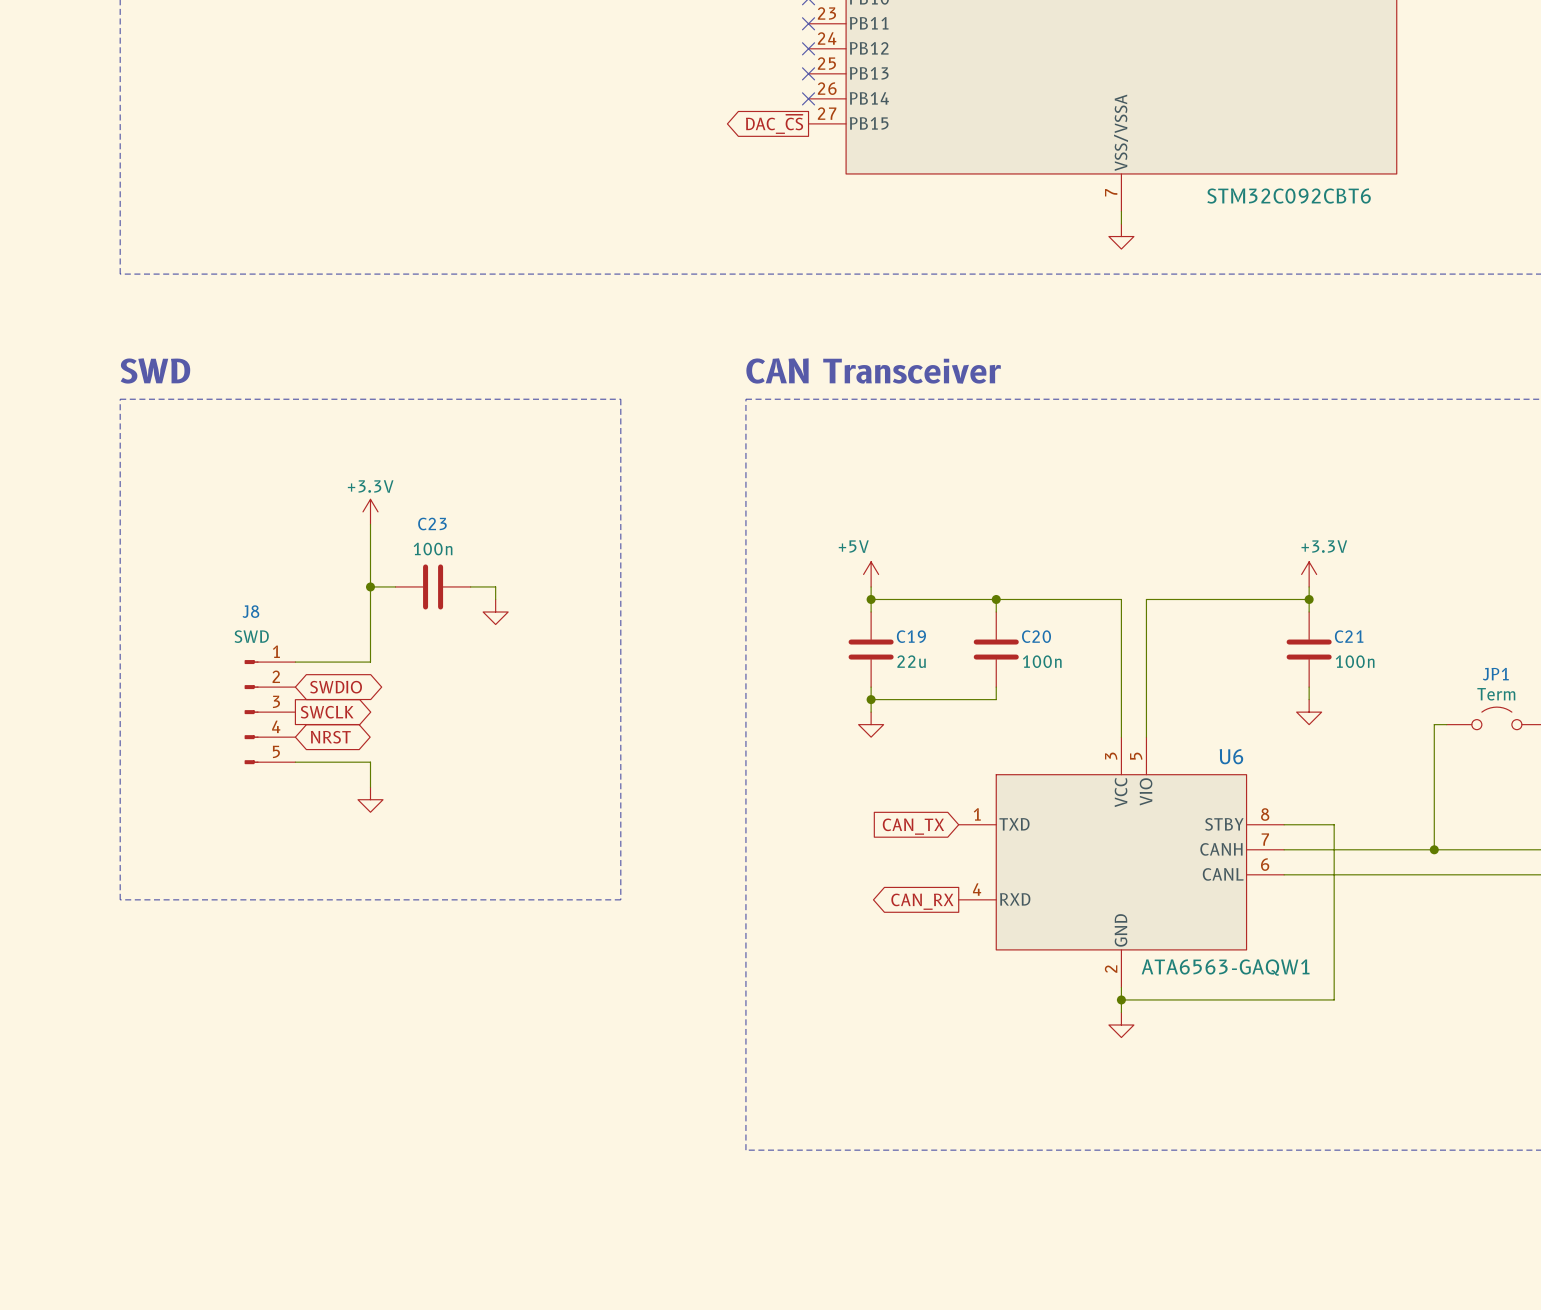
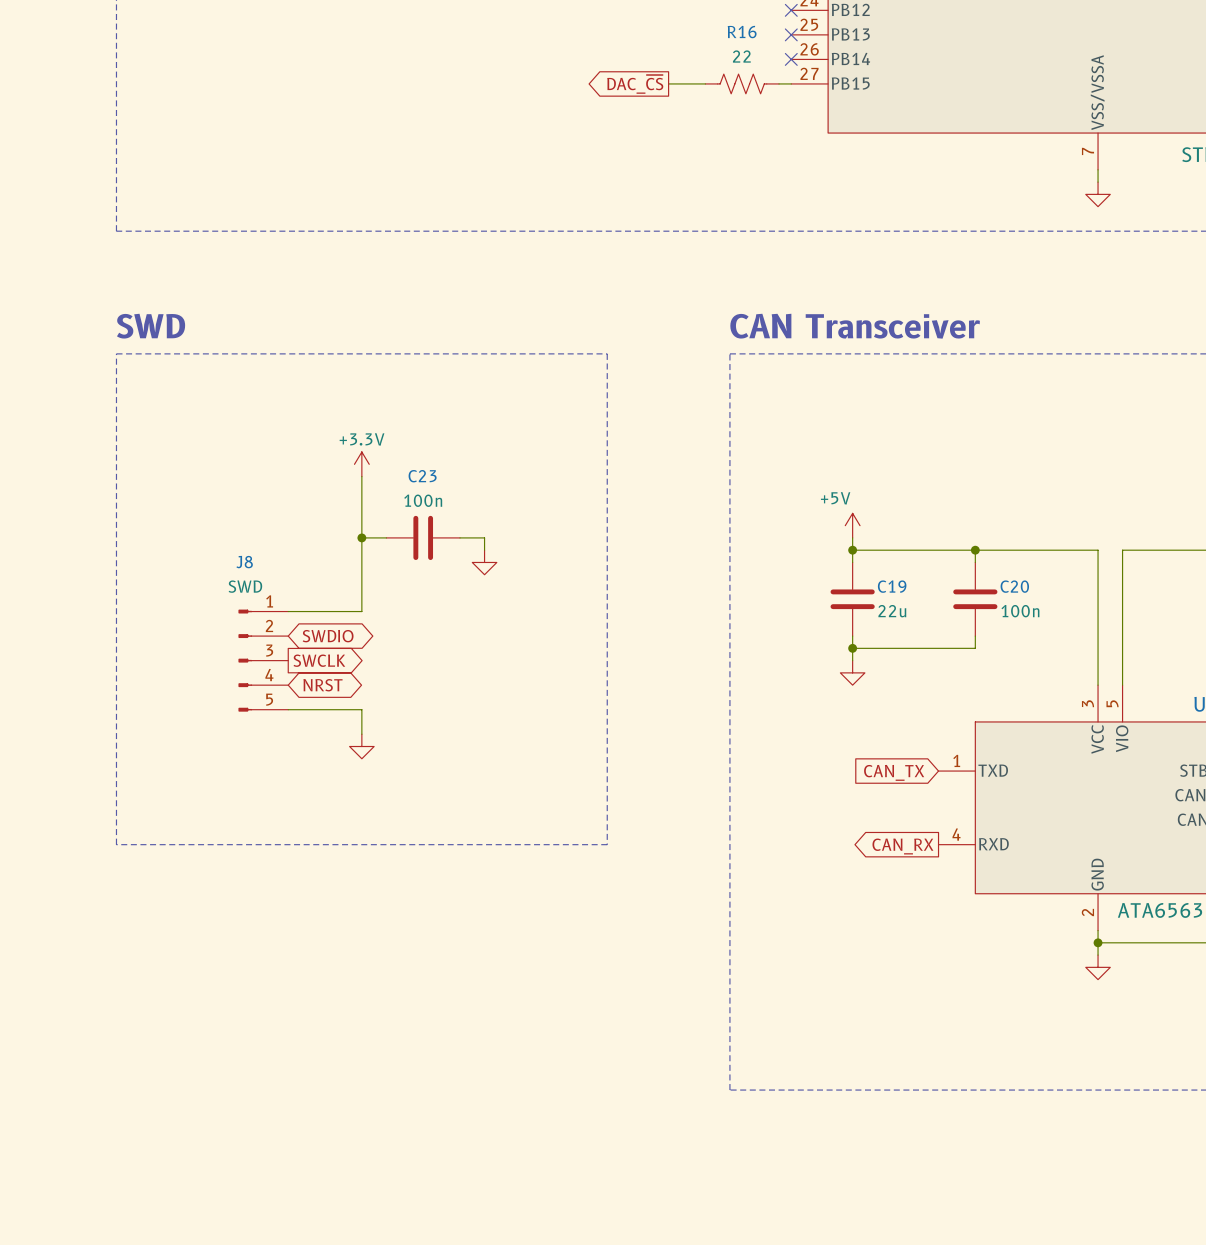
wire: none -> (668, 83) (705, 83)
R16: none -> 22 (742, 83)
wire: none -> (779, 83) (791, 83)
global label position: DAC_~{CS} (774, 124) -> DAC_~{CS} (635, 84)

